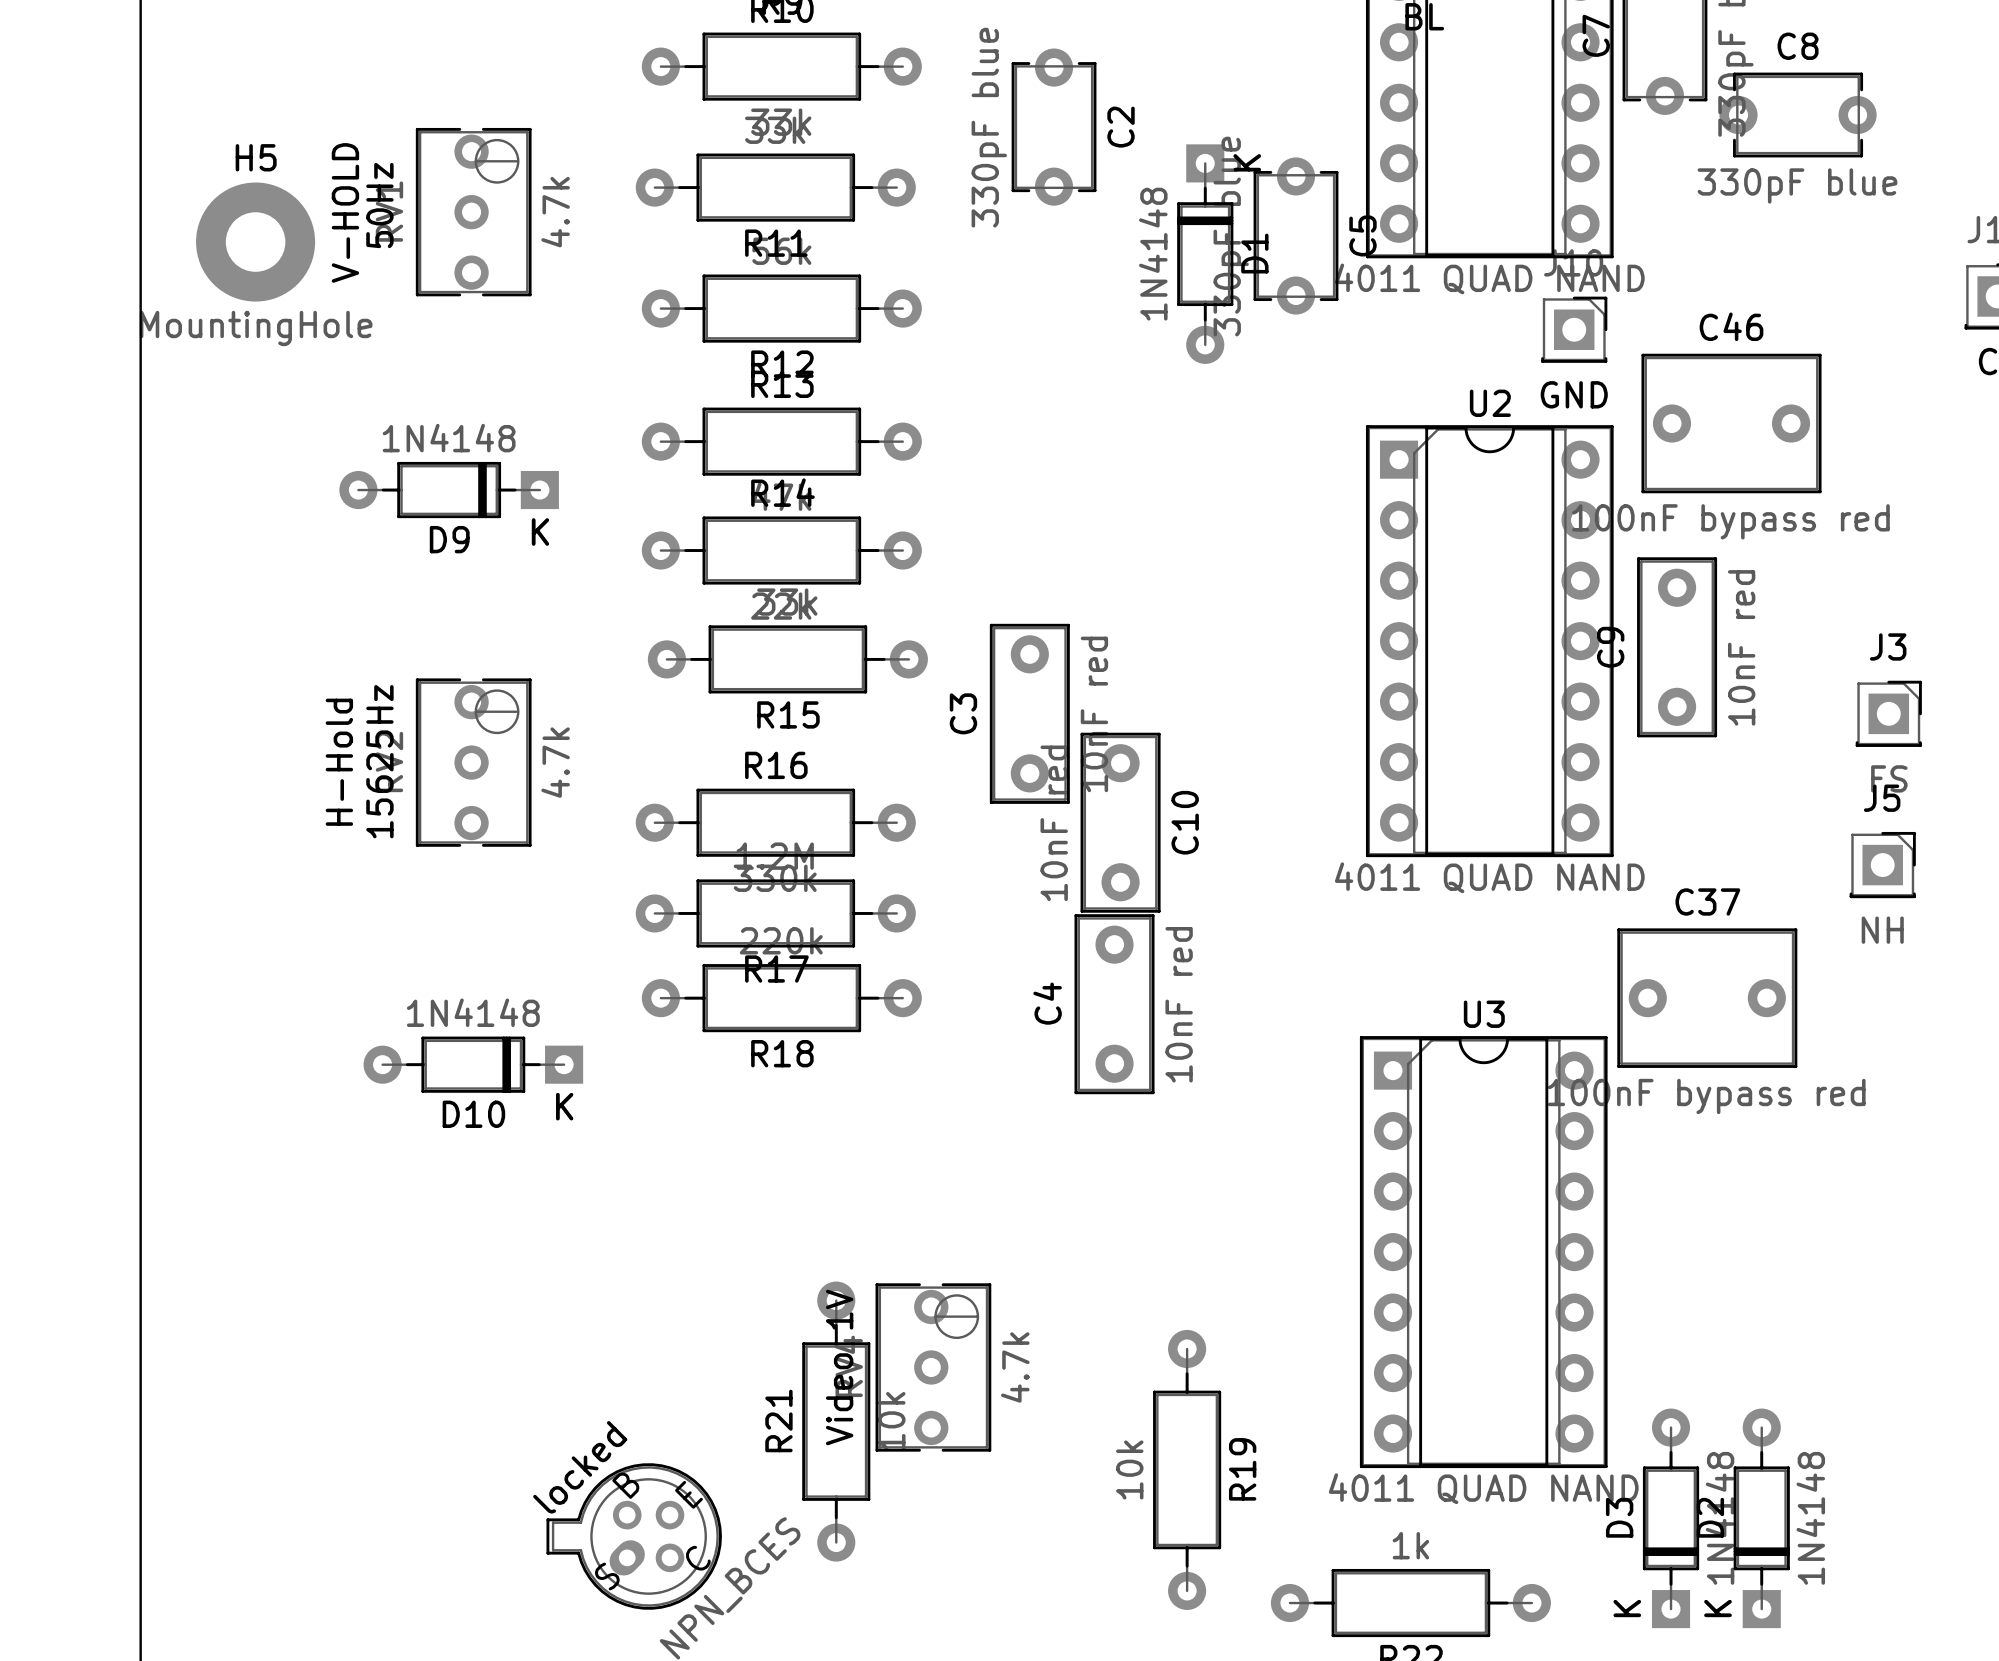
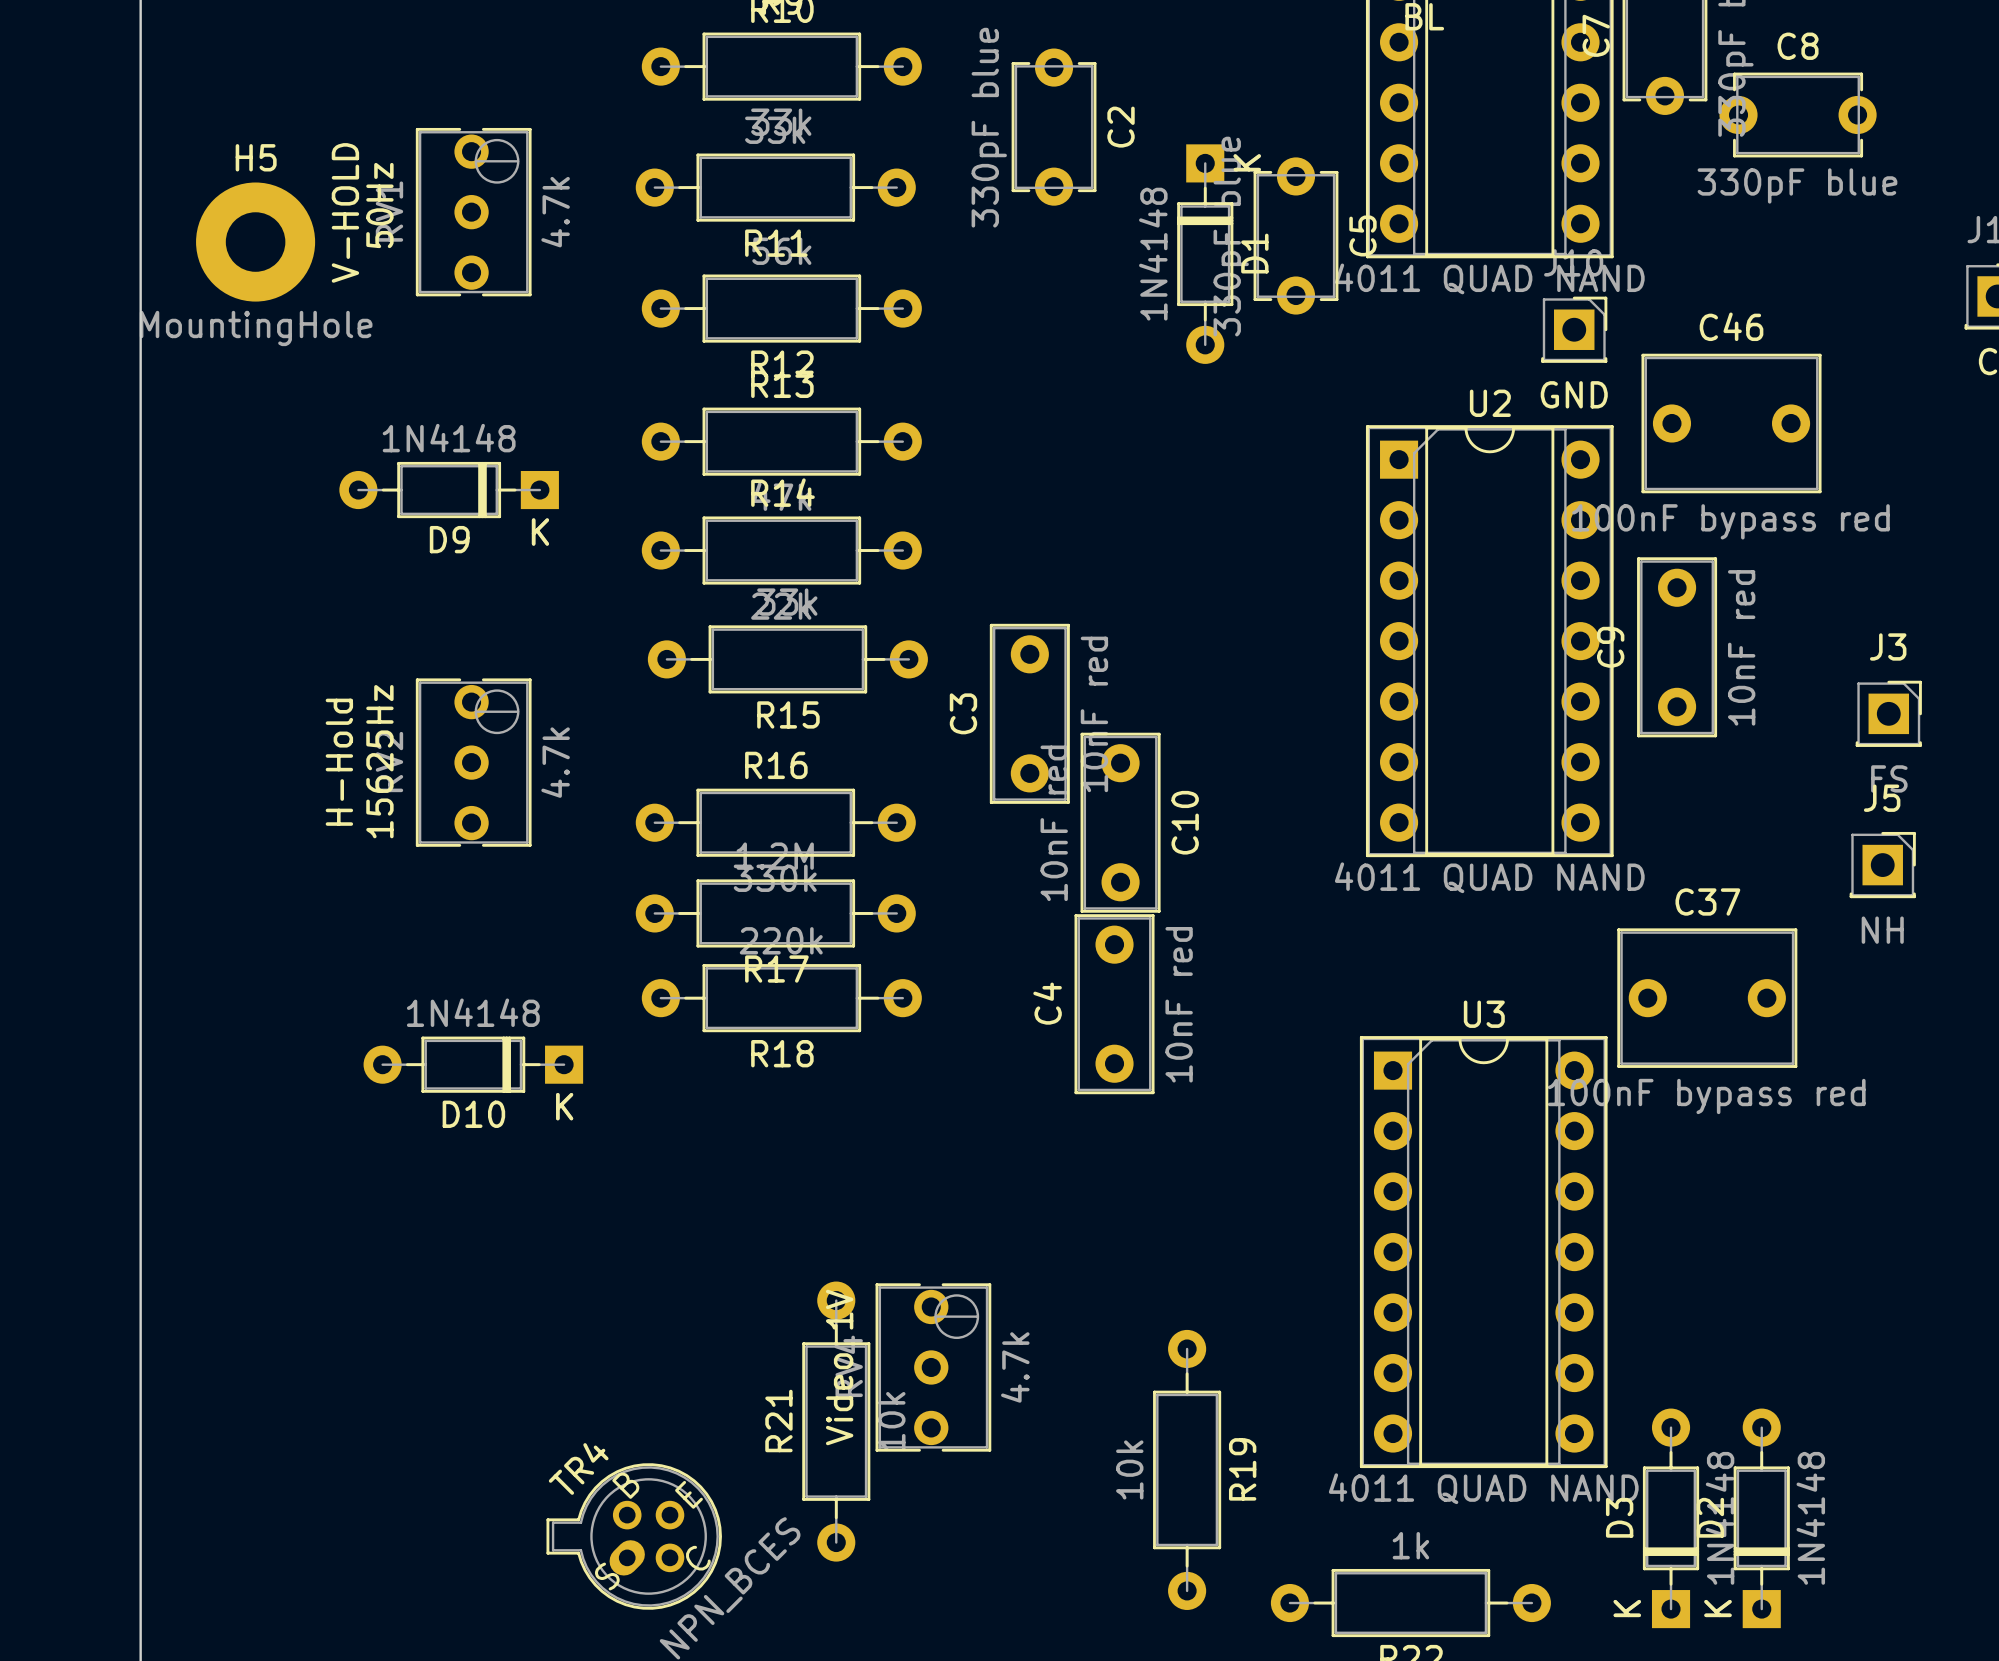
locked name: locked (580, 1467) -> TR4 (578, 1468)

